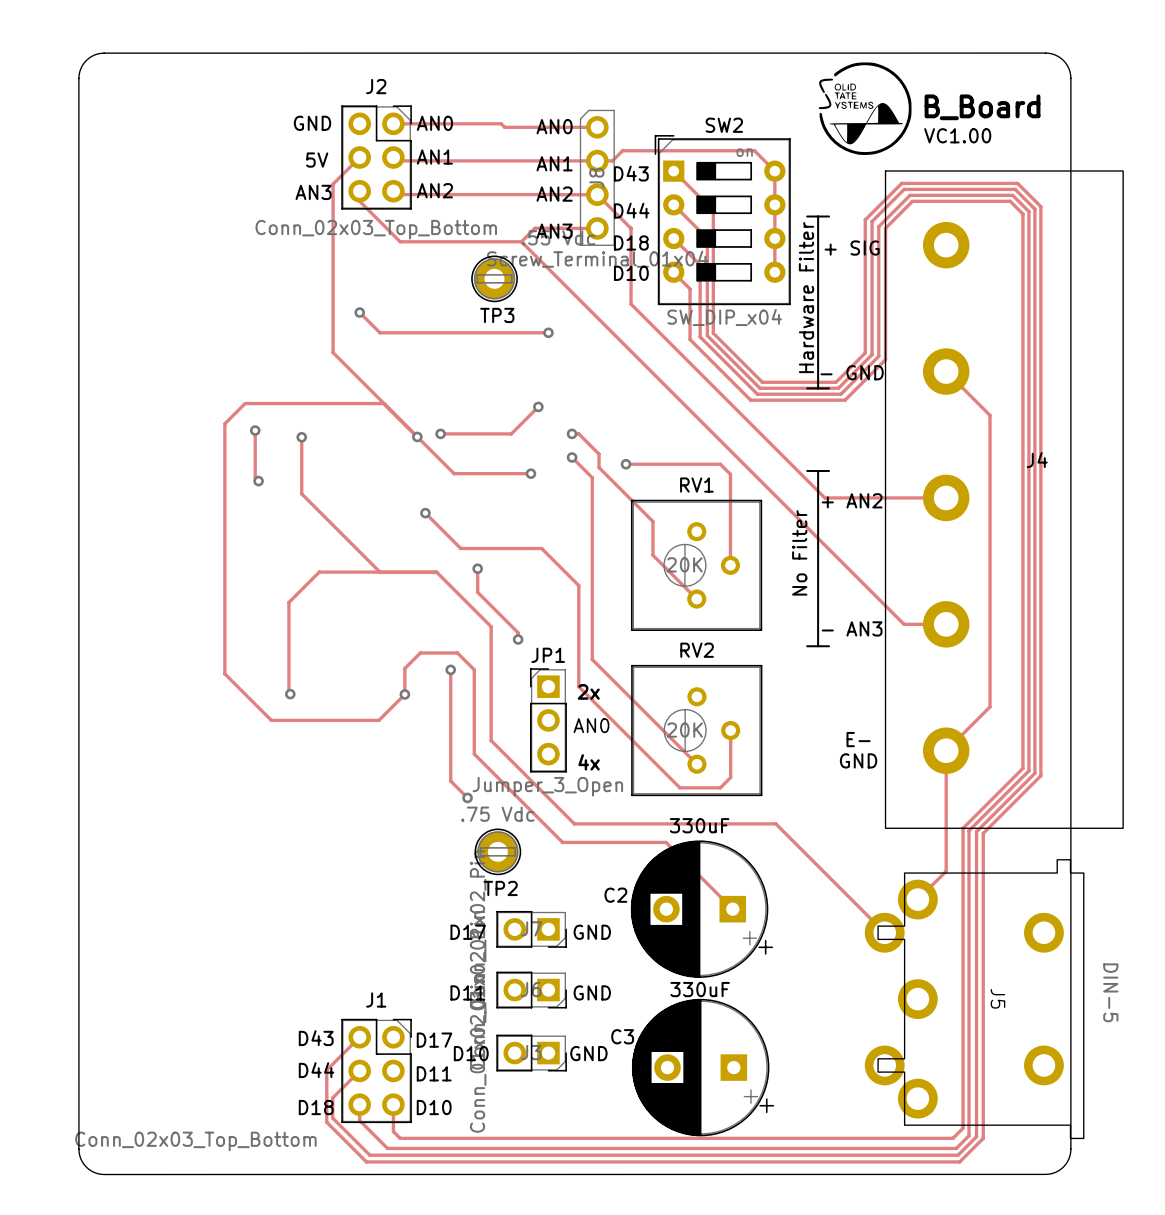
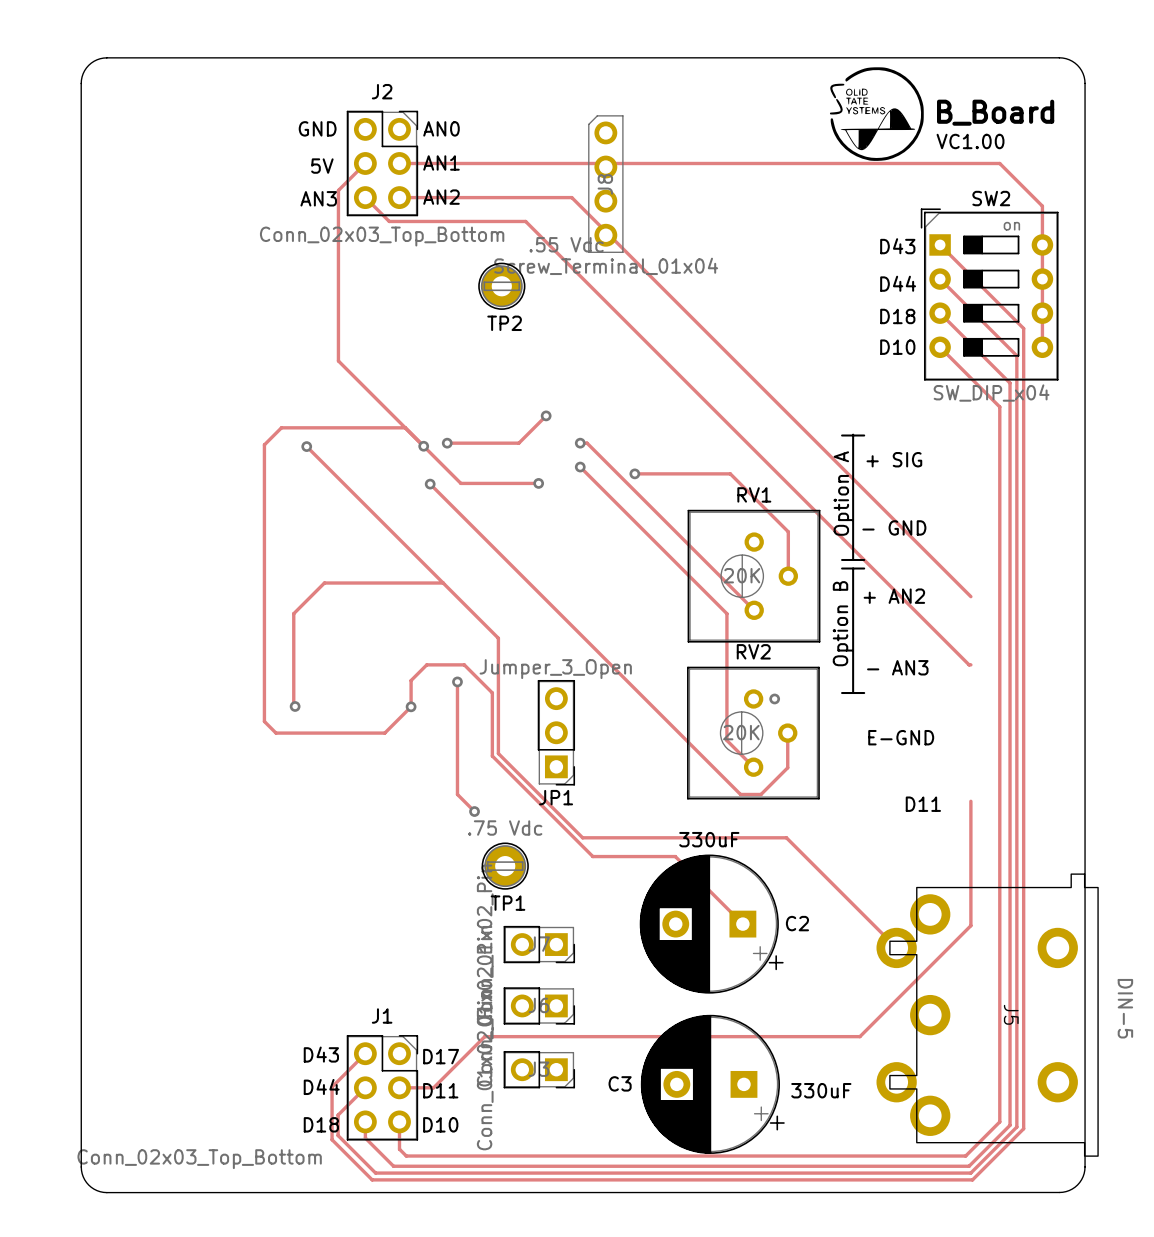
track: (393, 123) (501, 123) (504, 127) (597, 127) -> none
text: AN0 (554, 126) -> none
track: (393, 157) (396, 160) (612, 160) (622, 150) (754, 150) (774, 171) (774, 272) -> (399, 163) (999, 163) (1042, 206) (1042, 347)
text: AN1 (554, 163) -> none
track: (673, 171) (713, 210) (713, 333) (762, 382) (835, 382) (865, 352) (865, 219) (901, 183) (1017, 183) (1040, 206) (1040, 775) (983, 833) (983, 1138) -> (940, 244) (1023, 328) (1023, 1128) (996, 1156)
text position: D43 (631, 173) -> D43 (897, 246)
track: (359, 191) (359, 201) (400, 241) (521, 241) -> (365, 197) (389, 221) (525, 221) (970, 664)
track: (393, 191) (396, 194) (561, 194) -> (399, 197) (571, 197) (970, 596)
text: AN2 (554, 194) -> none
track: (562, 194) (597, 194) (630, 228) -> none
track: (673, 204) (707, 238) (707, 335) (759, 388) (838, 388) (872, 354) (872, 221) (904, 189) (1015, 189) (1034, 209) (1034, 773) (976, 831) (976, 1136) -> (940, 279) (1016, 355) (1016, 1127) (989, 1154)
text position: D44 (631, 210) -> D44 (898, 283)
line: (807, 216) (829, 216) -> (842, 435) (864, 435)
line: (818, 216) (818, 388) -> none
SW2 position: (722, 220) -> (989, 294)
track: (561, 228) (534, 228) (521, 241) -> none
track: (562, 228) (597, 228) -> none
track: (631, 228) (631, 304) (824, 497) (946, 497) -> none
text: AN3 (554, 231) -> none
track: (673, 238) (700, 264) (700, 336) (757, 394) (840, 394) (878, 356) (878, 226) (910, 195) (1012, 195) (1028, 211) (1028, 770) (969, 830) (969, 1135) -> (940, 313) (1010, 383) (1010, 1125) (981, 1153)
track: (521, 241) (904, 624) (946, 624) -> none
text position: D18 (631, 242) -> D18 (897, 316)
text position: + SIG (852, 248) -> + SIG (894, 459)
track: (673, 272) (690, 288) (690, 339) (750, 400) (845, 400) (885, 359) (885, 228) (912, 201) (1010, 201) (1022, 214) (1022, 768) (963, 828) (963, 1128) -> (940, 347) (999, 406) (999, 1121) (975, 1145)
text position: D10 (631, 273) -> D10 (897, 347)
text: Hardware Filter (806, 297) -> none
track: (359, 312) (379, 332) (548, 332) -> none
via: (359, 312) -> none
TP3 name: TP3 (497, 315) -> TP2 (504, 323)
via: (548, 332) -> none
track: (946, 371) (990, 415) (990, 706) (946, 750) (946, 871) (917, 899) -> none
text position: - GND (852, 372) -> - GND (894, 527)
line: (807, 388) (829, 388) -> (842, 559) (864, 559)
track: (383, 403) (245, 403) (224, 423) (224, 673) (259, 708) -> (405, 427) (281, 427) (264, 444) (264, 721)
line: none -> (853, 434) (853, 559)
track: (255, 430) (255, 477) (258, 481) -> none
via: (255, 430) -> none
track: (301, 437) (301, 493) (380, 572) (436, 572) -> (306, 446) (443, 583)
track: (599, 454) (599, 467) (652, 521) (652, 555) (696, 599) -> (607, 463) (754, 610)
line: (807, 470) (829, 470) -> (842, 693) (864, 693)
line: (818, 470) (818, 646) -> none
track: none -> (430, 484) (740, 794) (761, 794) (787, 767) (787, 733)
track: (730, 474) (730, 565) -> (740, 484) (788, 531) (788, 576)
track: (592, 477) (592, 659) (696, 764) -> (600, 487) (726, 613) (726, 740) (753, 767)
via: (258, 481) -> none
text: none -> Option A (843, 493)
J4: (1004, 499) -> none
text position: + AN2 (852, 500) -> + AN2 (894, 596)
track: (425, 513) (460, 548) (541, 548) (578, 585) (578, 686) (679, 787) (720, 787) (730, 777) (730, 730) -> none
via position: (425, 513) -> (430, 484)
text: No Filter (799, 552) -> none
line: none -> (853, 568) (853, 693)
RV1 position: (696, 565) -> (754, 576)
track: (477, 568) (477, 592) (518, 632) (518, 639) -> none
via: (477, 568) -> none
text: none -> Option B (842, 623)
text position: - AN3 (852, 628) -> - AN3 (897, 667)
via: (518, 639) -> none
line: (807, 646) (829, 646) -> (842, 568) (864, 568)
RV2 footprint: [631, 664, 763, 797] -> [687, 666, 820, 800]
track: (474, 669) (474, 754) (562, 842) (584, 842) -> (481, 681) (492, 692) (492, 756) (592, 856)
via: none -> (774, 698)
text: 2x (588, 691) -> none
JP1 rotation: 0° (548, 720) -> 180° (556, 732)
text: none -> E-GND (901, 737)
text: AN0 (591, 725) -> none
text: E- (858, 739) -> none
text: GND (858, 760) -> none
text: 4x (589, 762) -> none
track: none -> (970, 801) (970, 925) (859, 1036) (484, 1036) (433, 1087) (399, 1087)
text: none -> D11 (923, 804)
TP2 name: TP2 (500, 888) -> TP1 (508, 903)
C2 name position: C2 (615, 895) -> C2 (797, 923)
text: D17 (468, 932) -> none
text: GND (592, 932) -> none
C3 value position: 330uF (700, 989) -> 330uF (821, 1090)
text: D11 (467, 992) -> none
text: GND (592, 992) -> none
C3 name position: C3 (622, 1036) -> C3 (620, 1083)
text: D10 (471, 1053) -> none
text: GND (588, 1053) -> none

